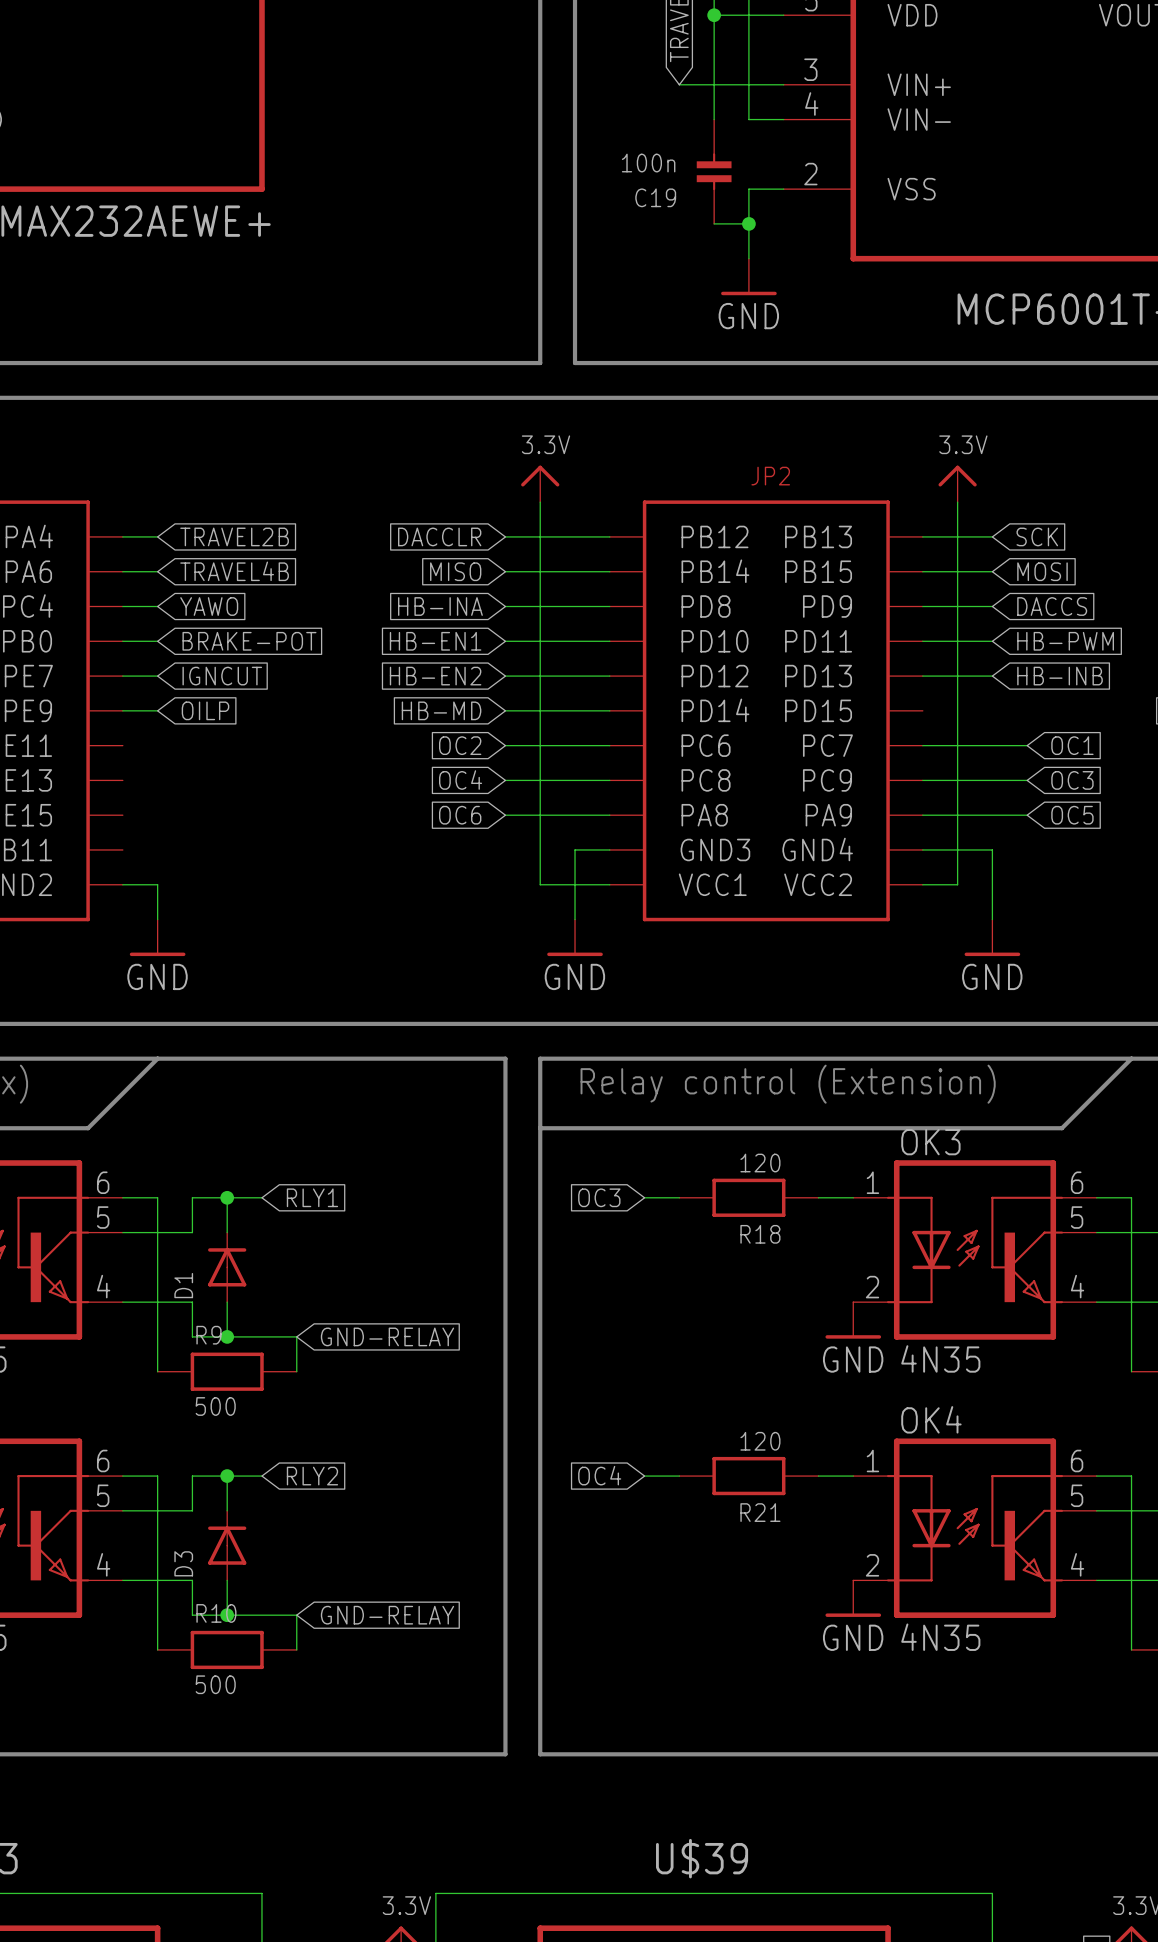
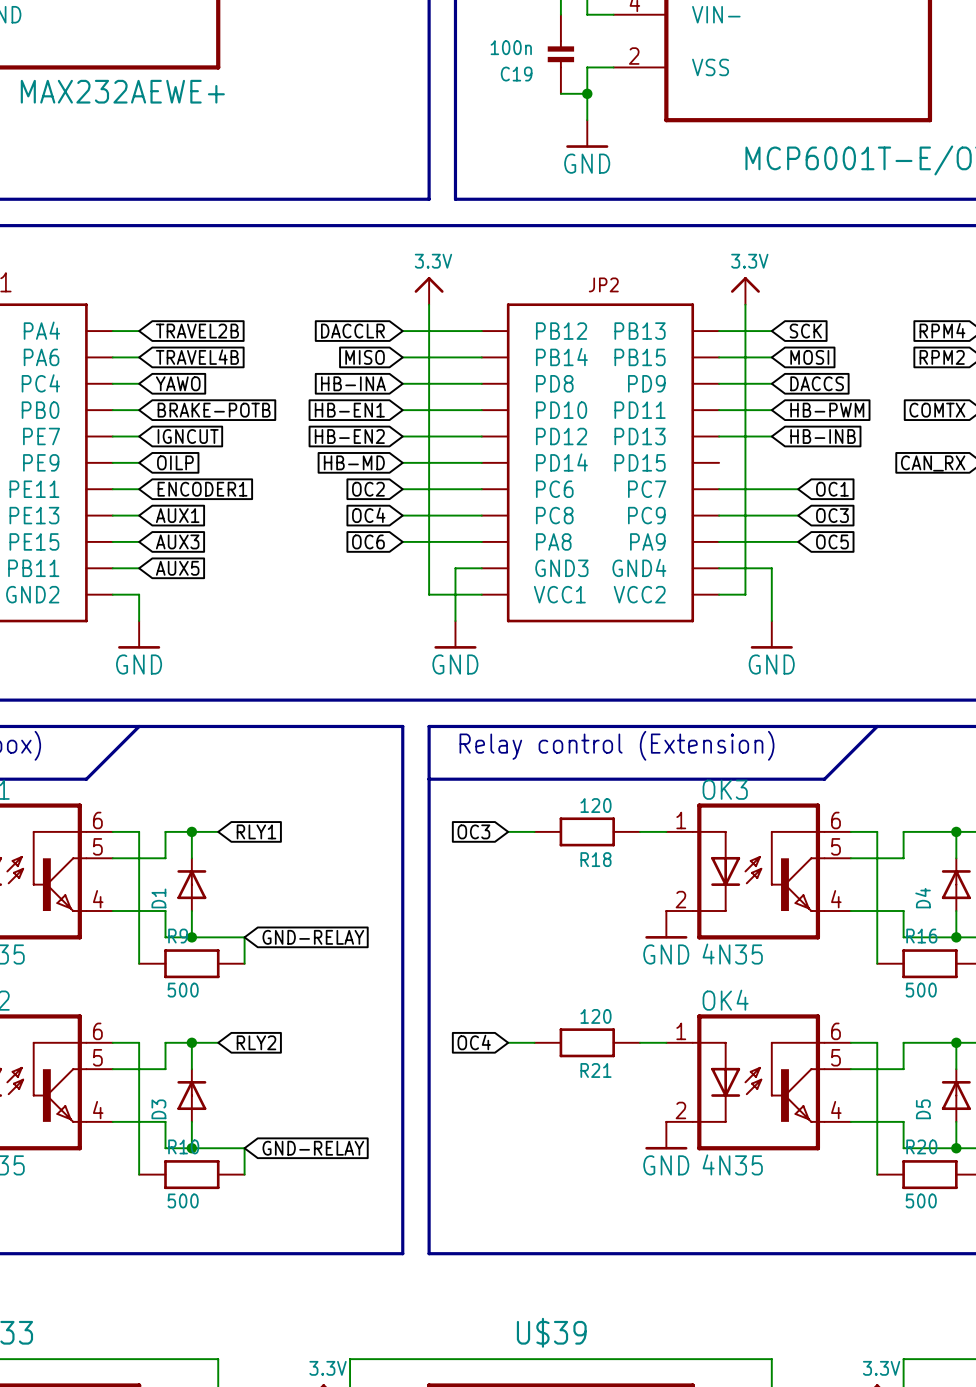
global label: BRAKE-POT (249, 641) -> BRAKE-POTB (214, 410)
wire: none -> (112, 489) (139, 489)
global label: none -> ENCODER1 (202, 489)
wire: none -> (112, 515) (139, 515)
global label: none -> AUX1 (177, 515)
wire: none -> (112, 541) (139, 541)
global label: none -> AUX3 (177, 541)
wire: none -> (112, 568) (139, 568)
global label: none -> AUX5 (177, 568)

